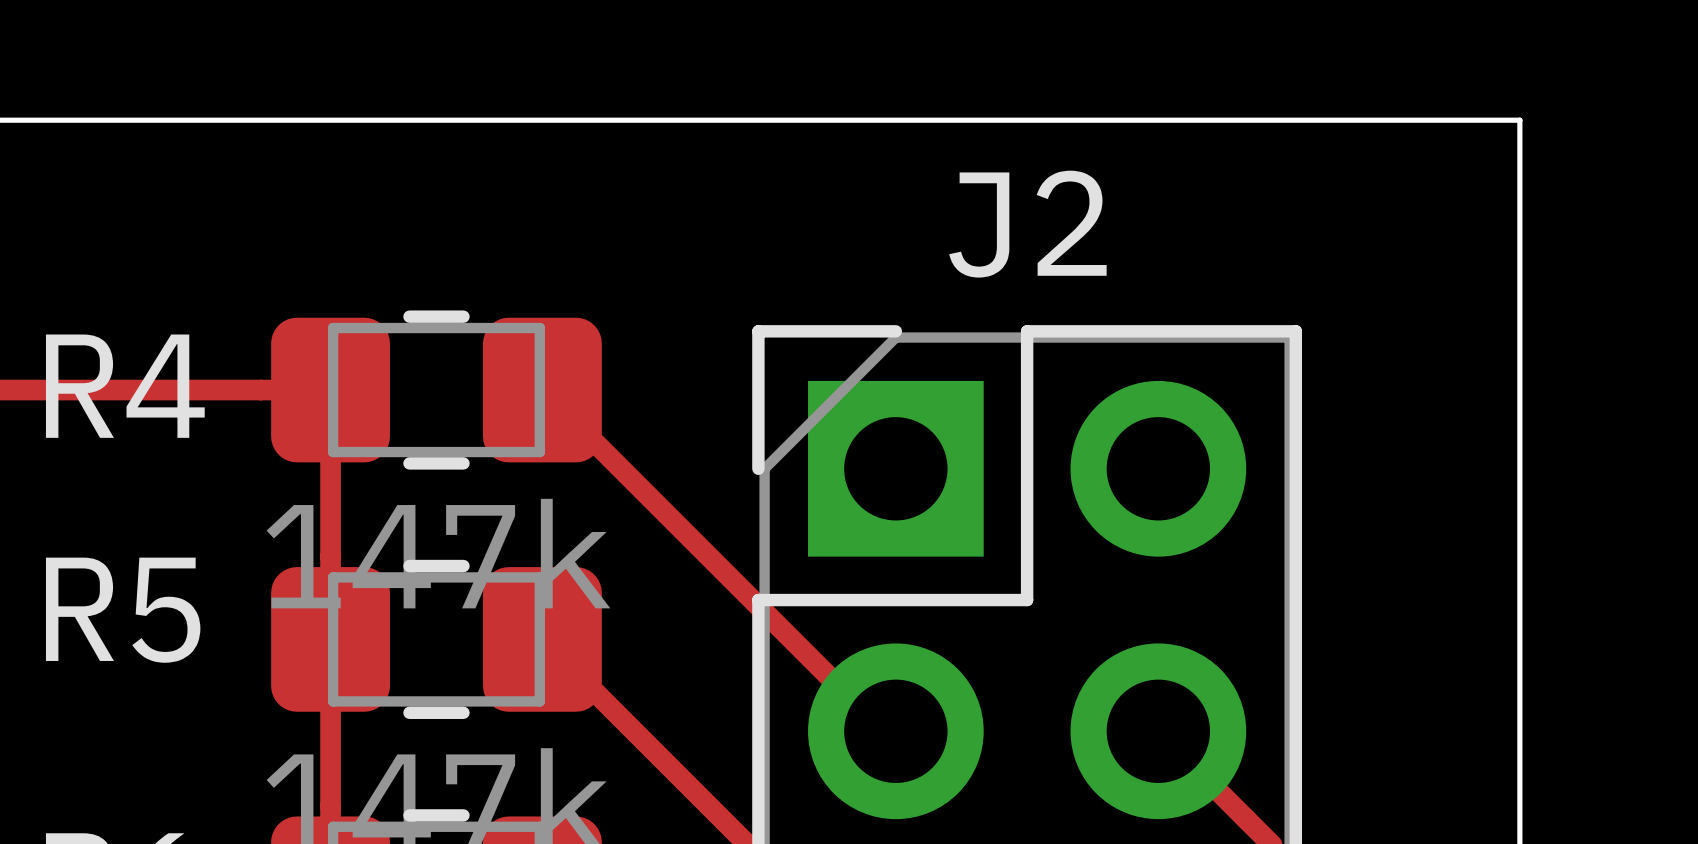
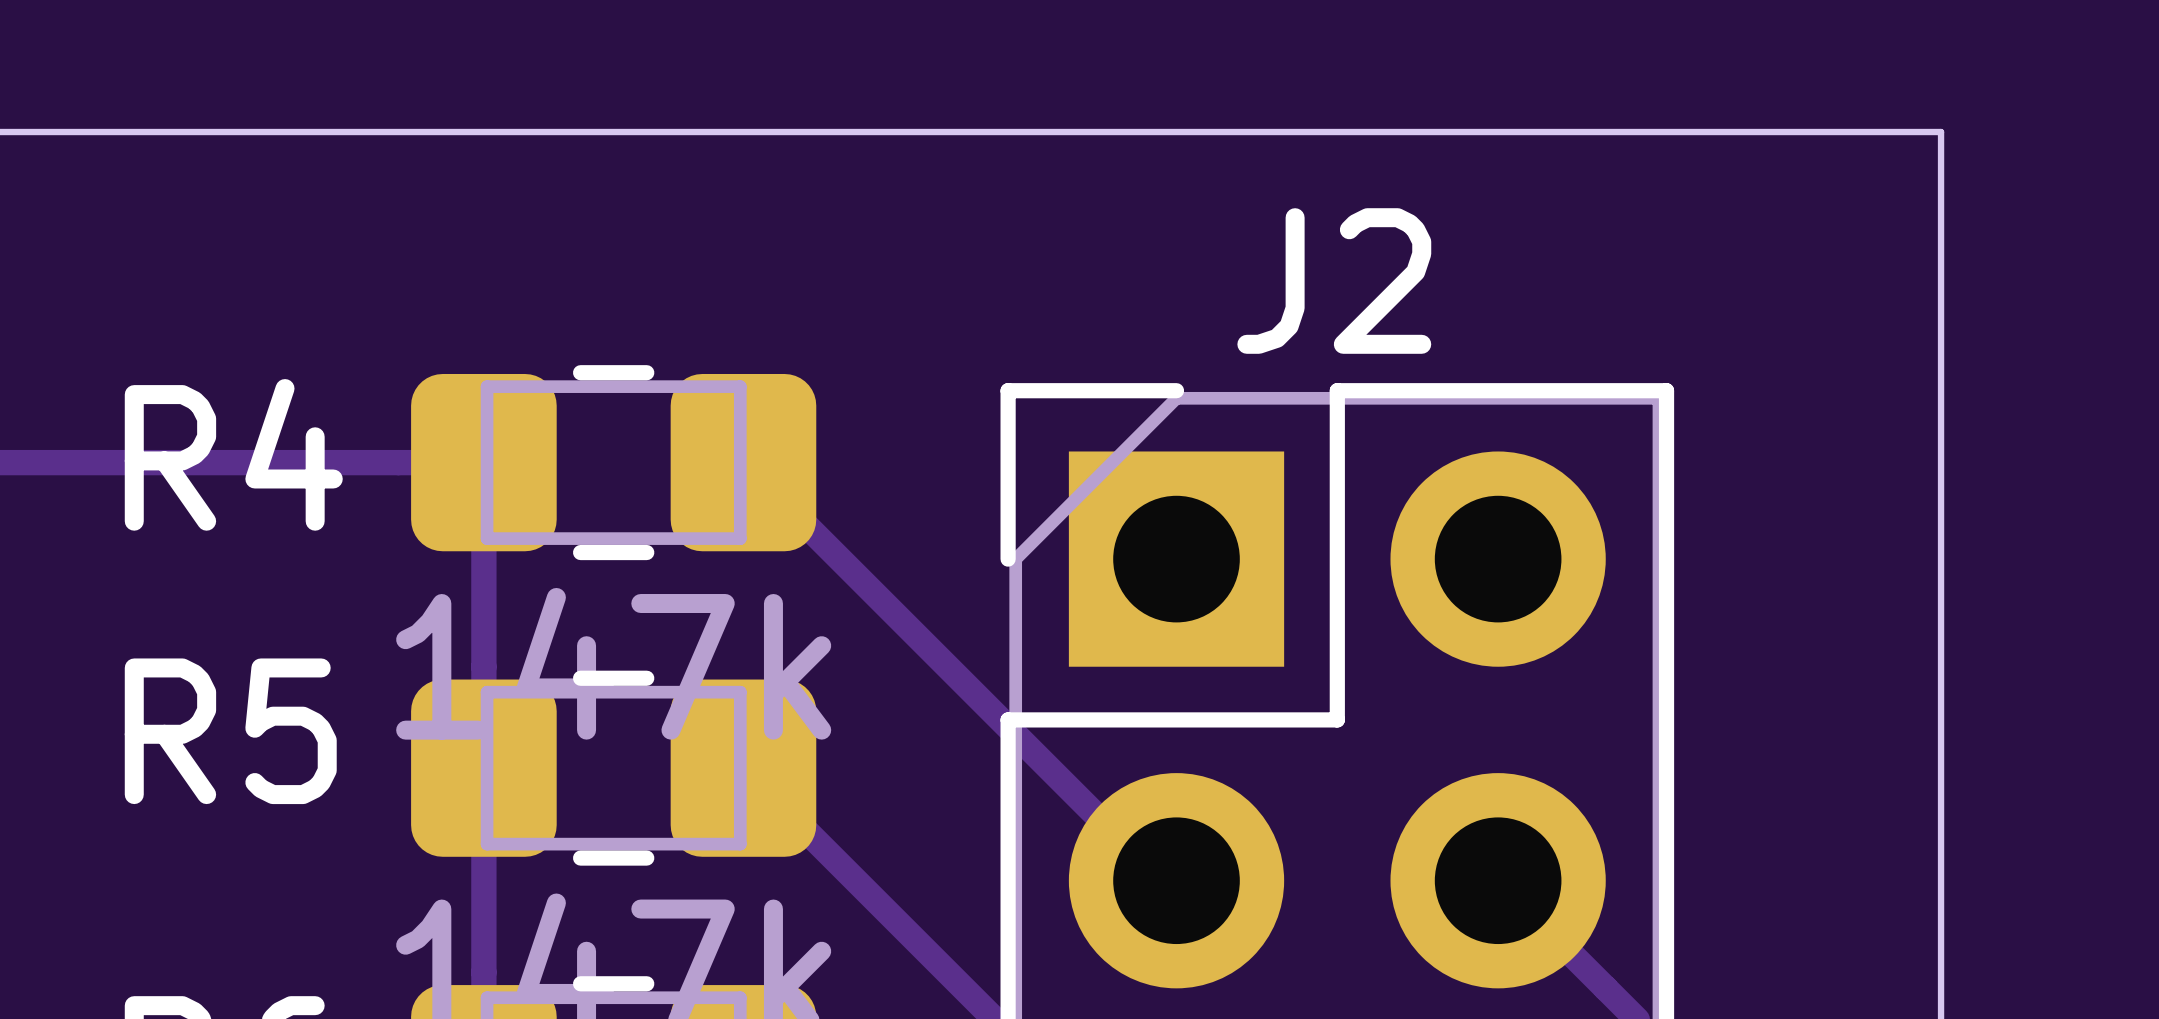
J2 name position: J2 (1027, 224) -> J2 (1334, 281)

